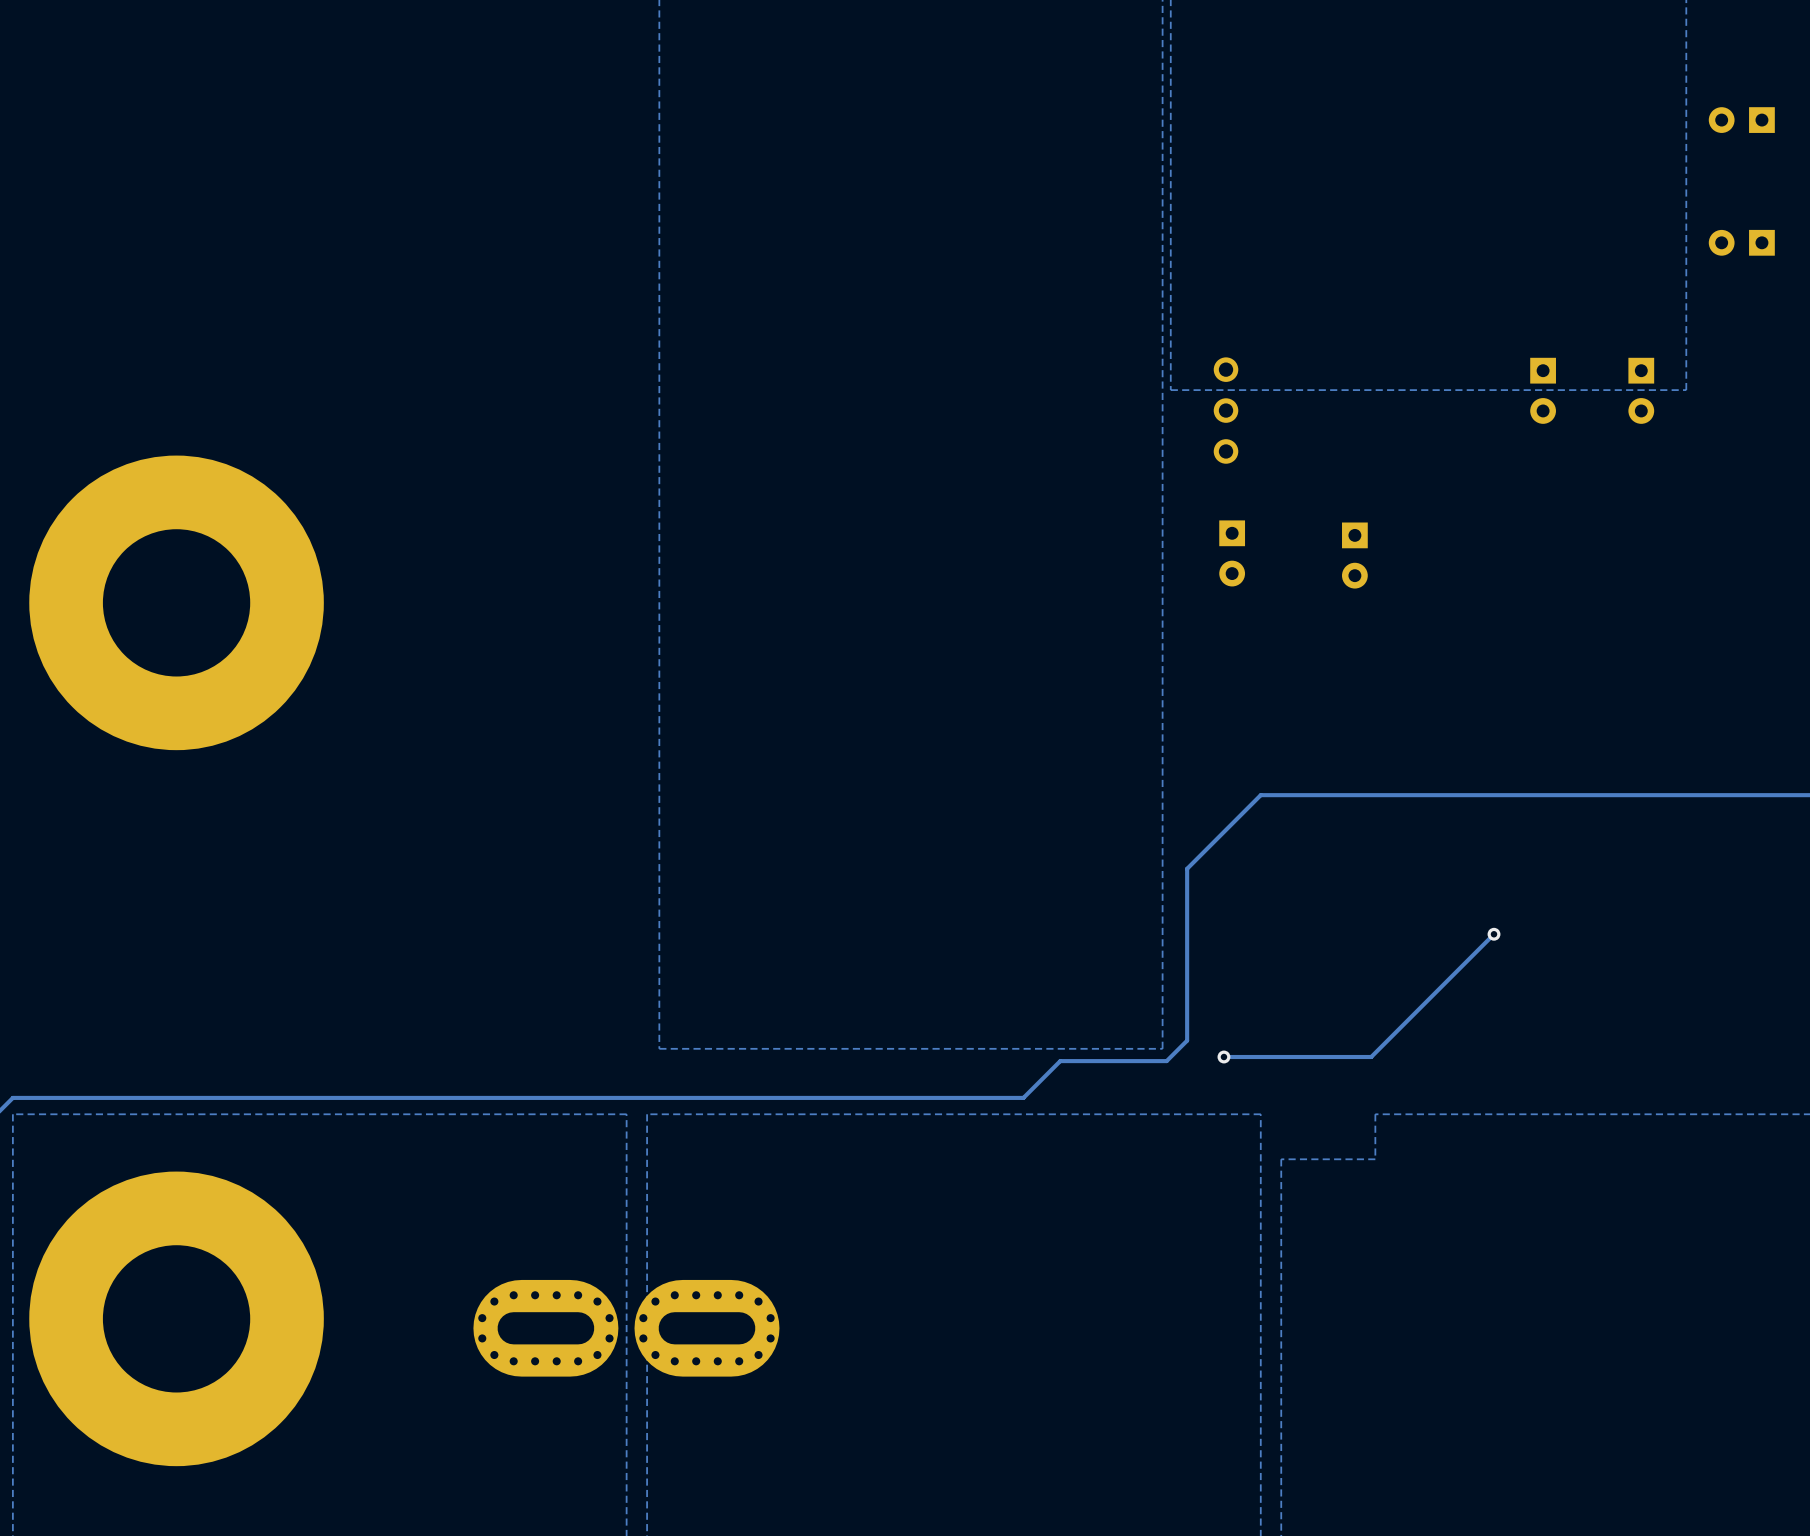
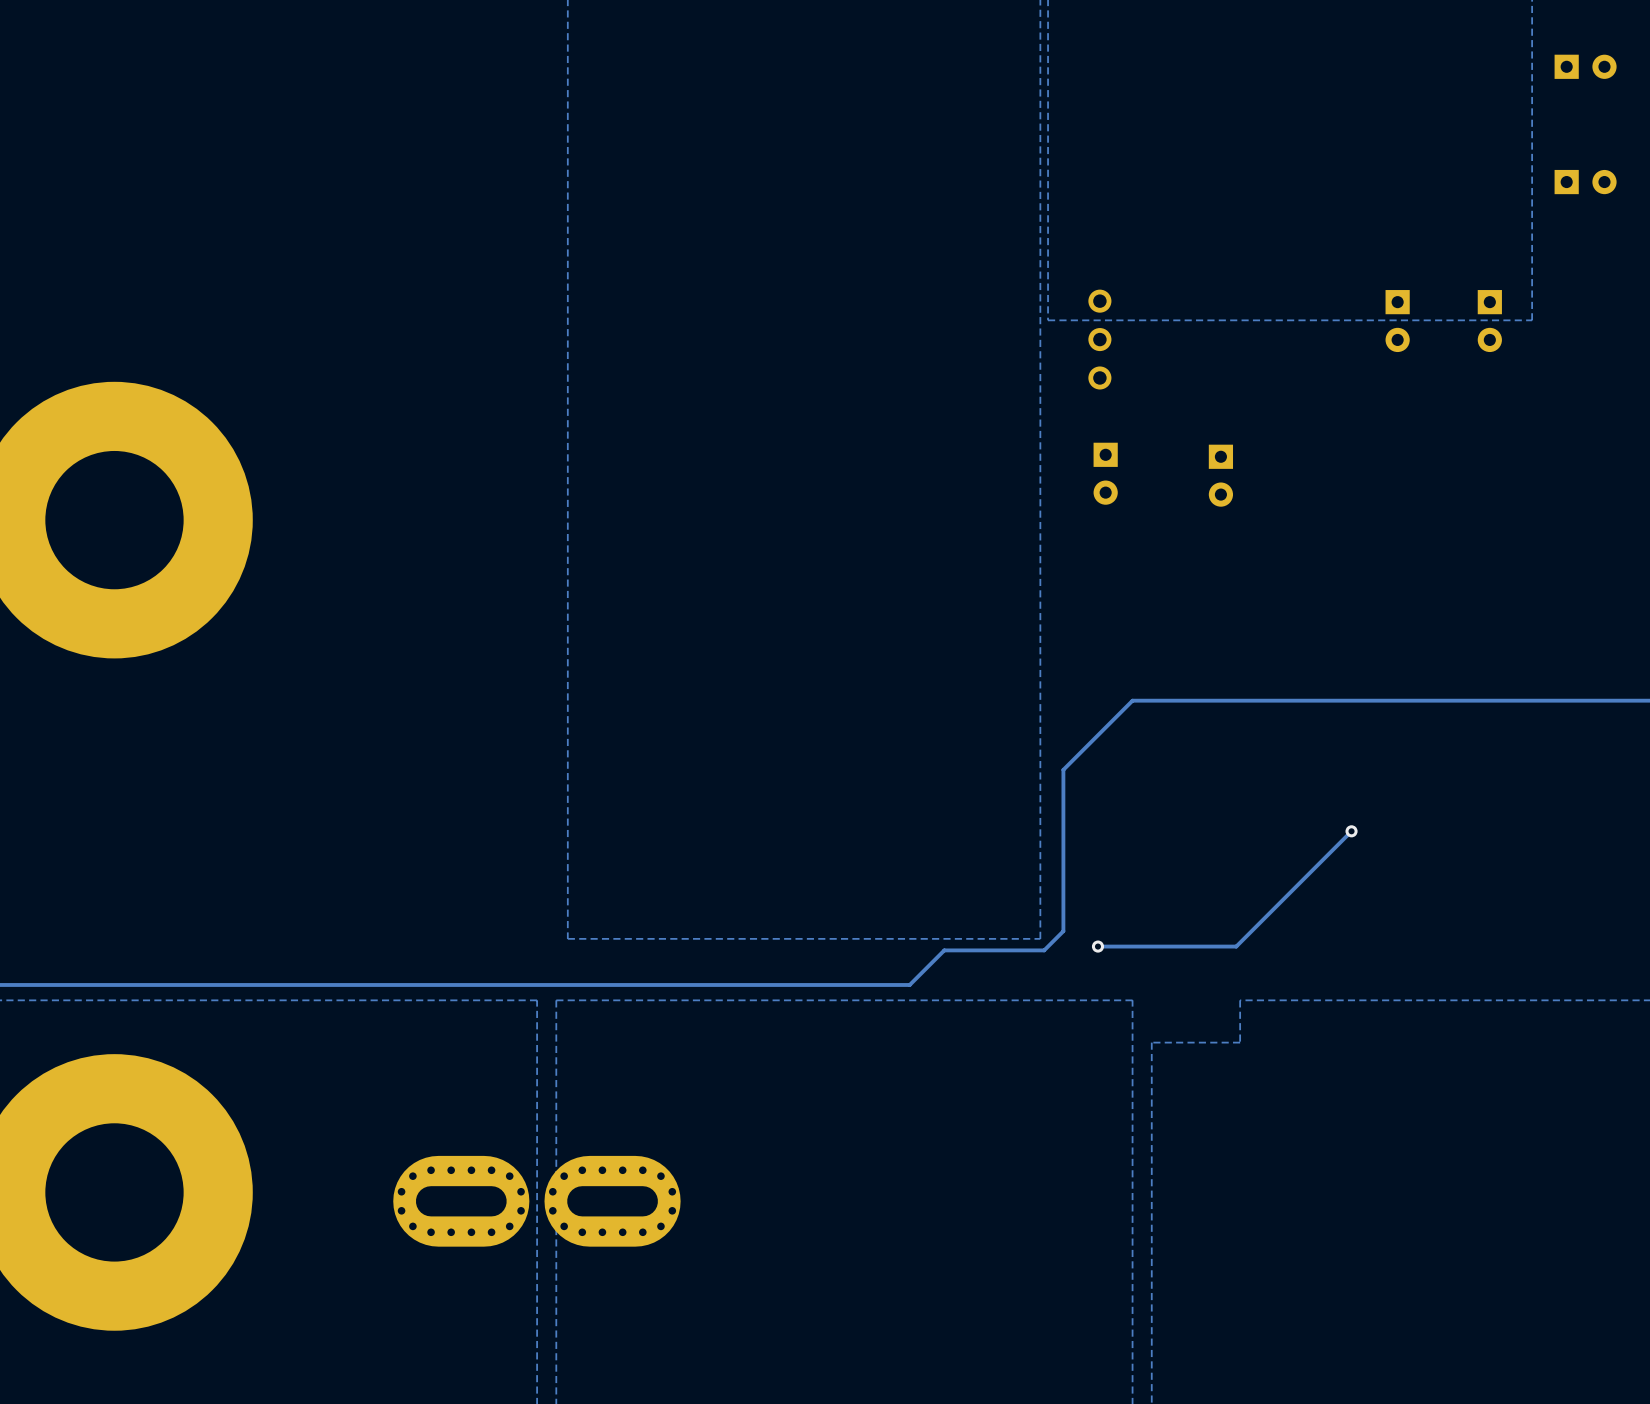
part rotation: 0° (1741, 120) -> 180° (1585, 66)
part rotation: 0° (1741, 242) -> 180° (1585, 182)

